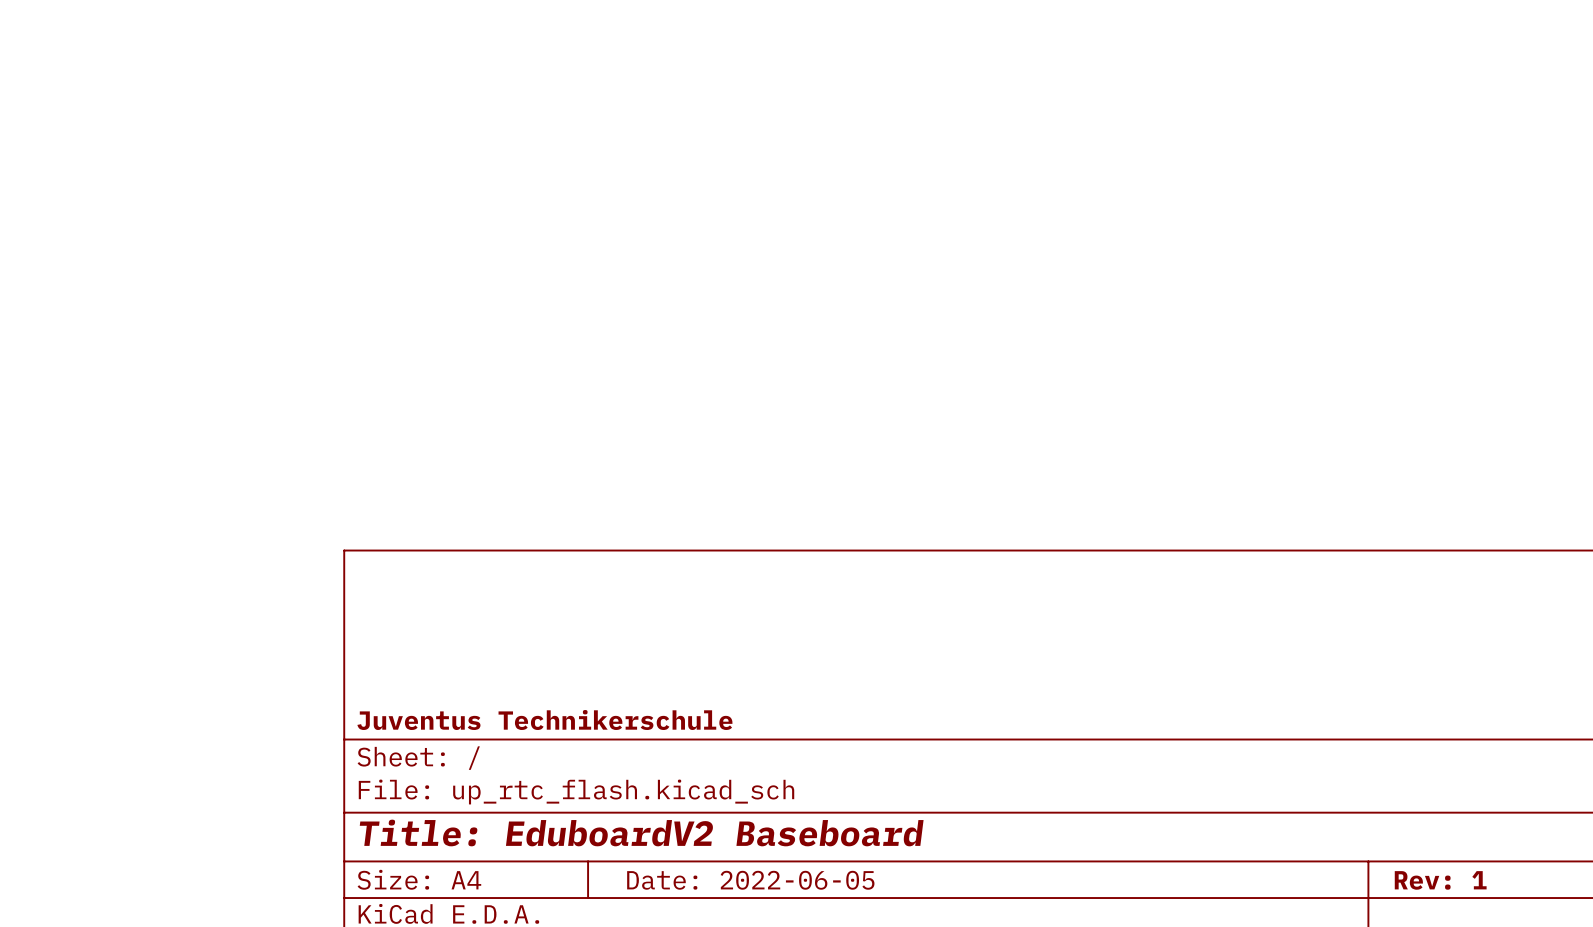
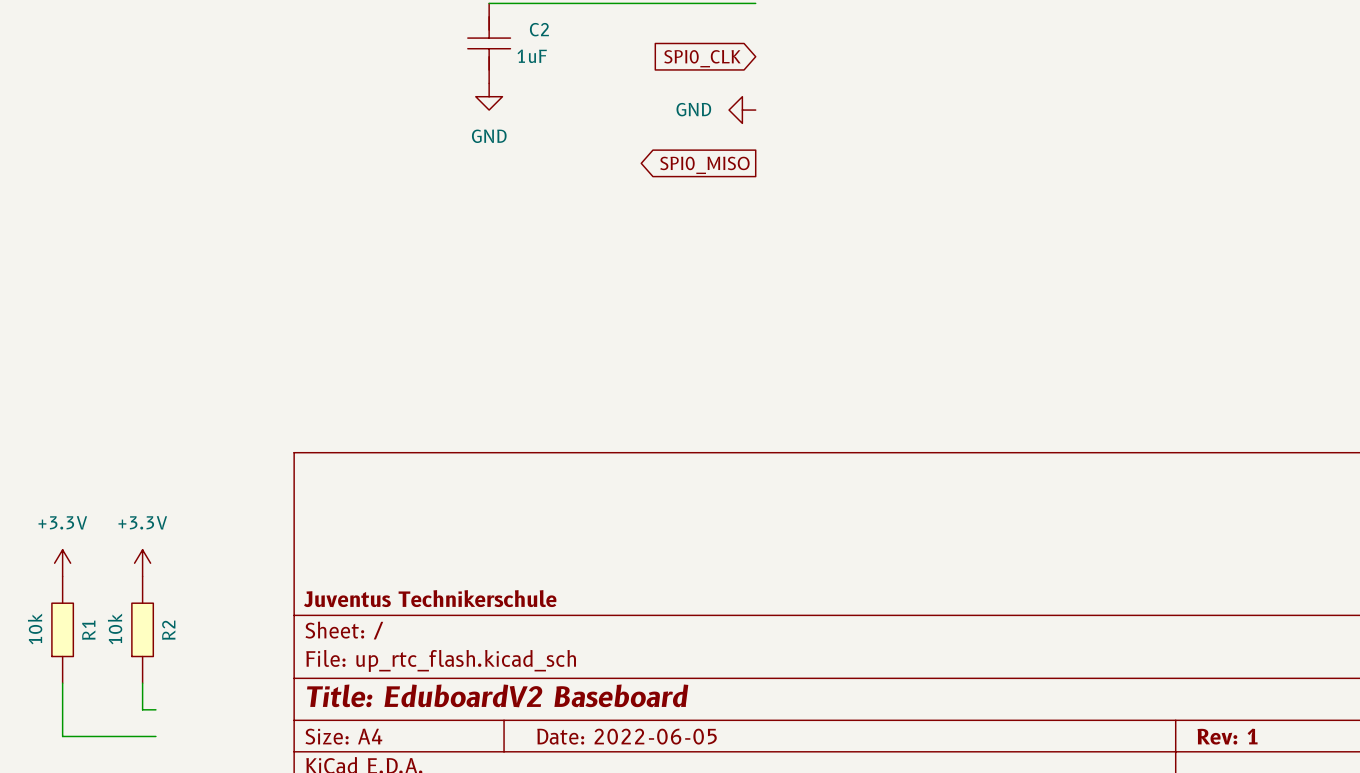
wire: none -> (489, 3) (755, 3)
C2: none -> 1uF (489, 43)
global label: none -> SPI0_CLK (702, 58)
power symbol: none -> GND (489, 96)
power symbol: none -> GND (742, 110)
global label: none -> SPI0_MISO (704, 165)
power symbol: none -> +3.3V (62, 563)
power symbol: none -> +3.3V (142, 563)
R1: none -> 10k (62, 629)
R2: none -> 10k (142, 629)
wire: none -> (62, 683) (62, 736) (155, 736)
wire: none -> (142, 683) (142, 709) (155, 709)

